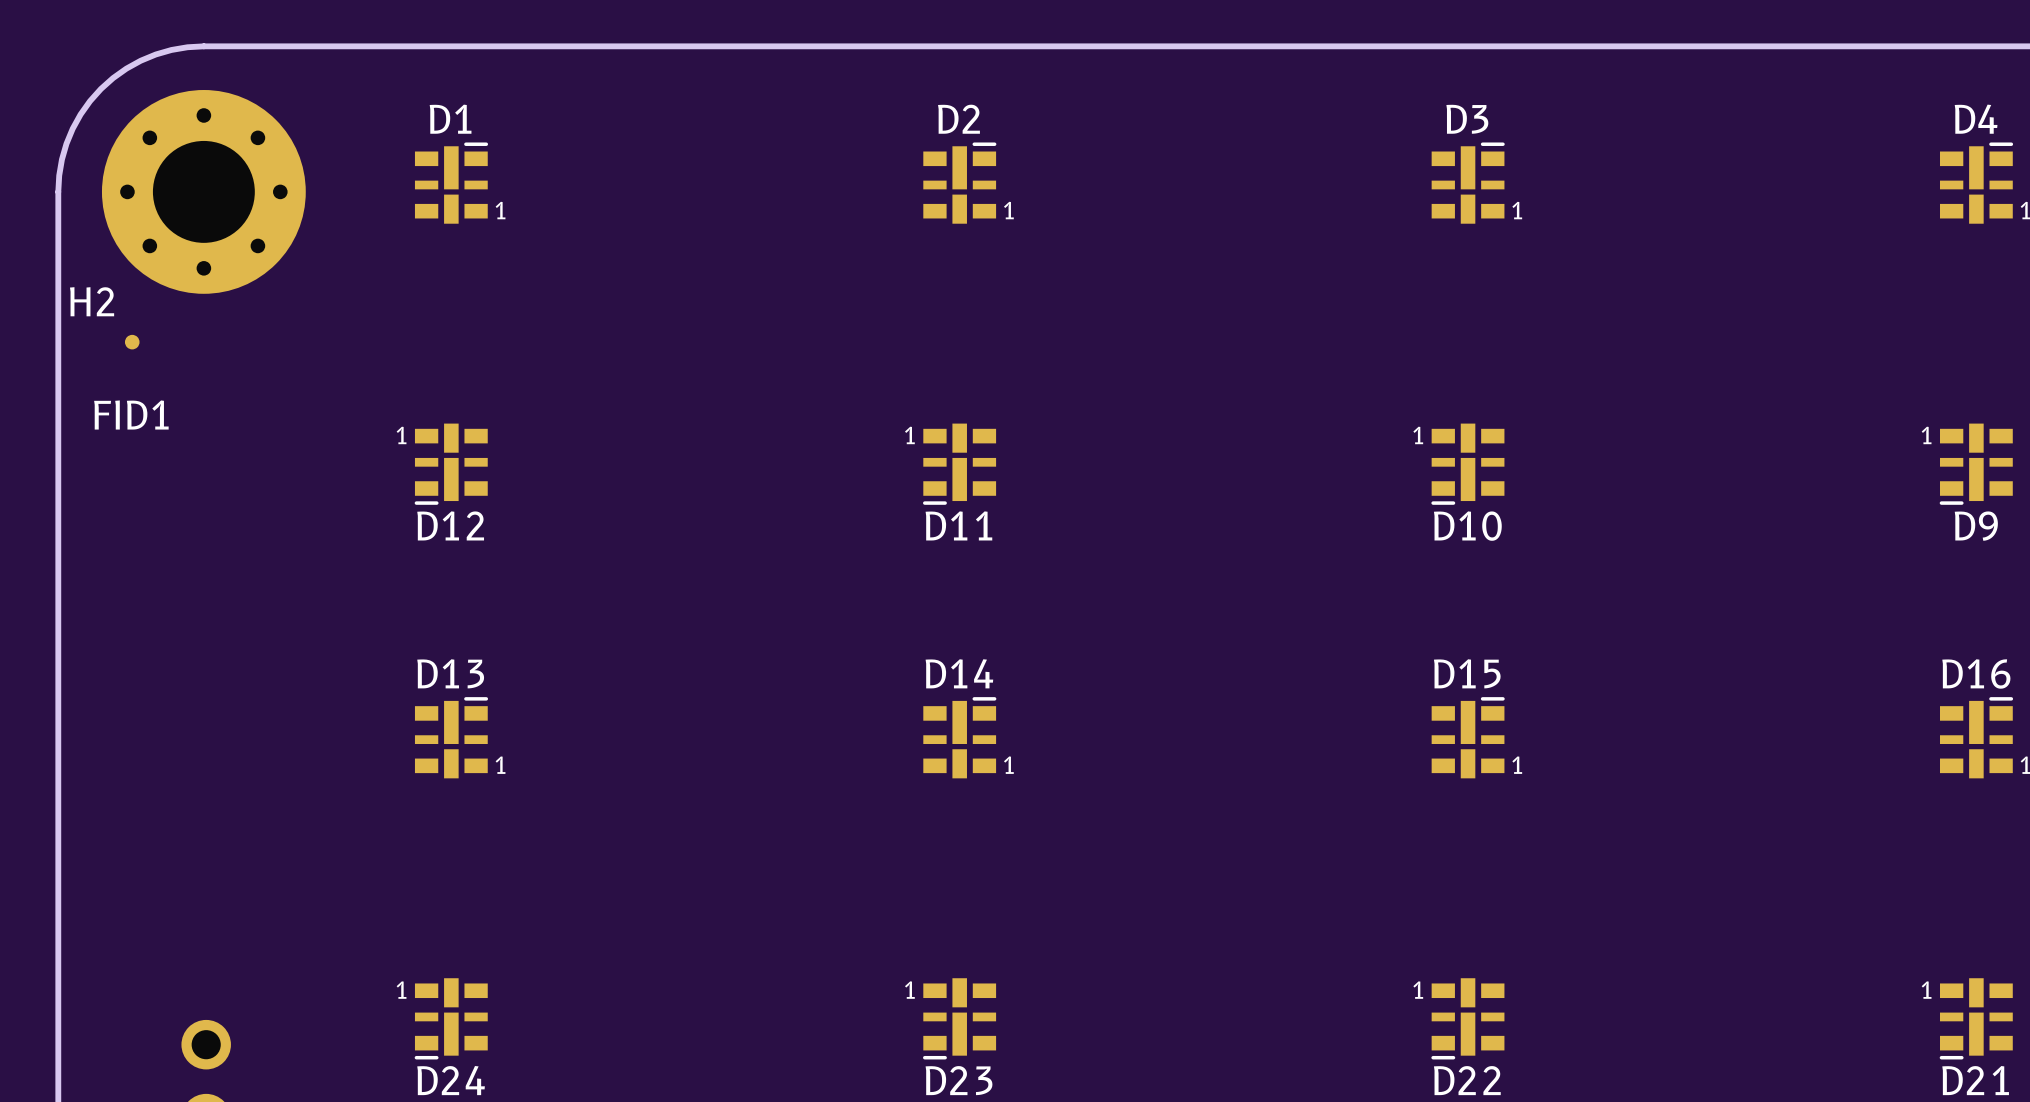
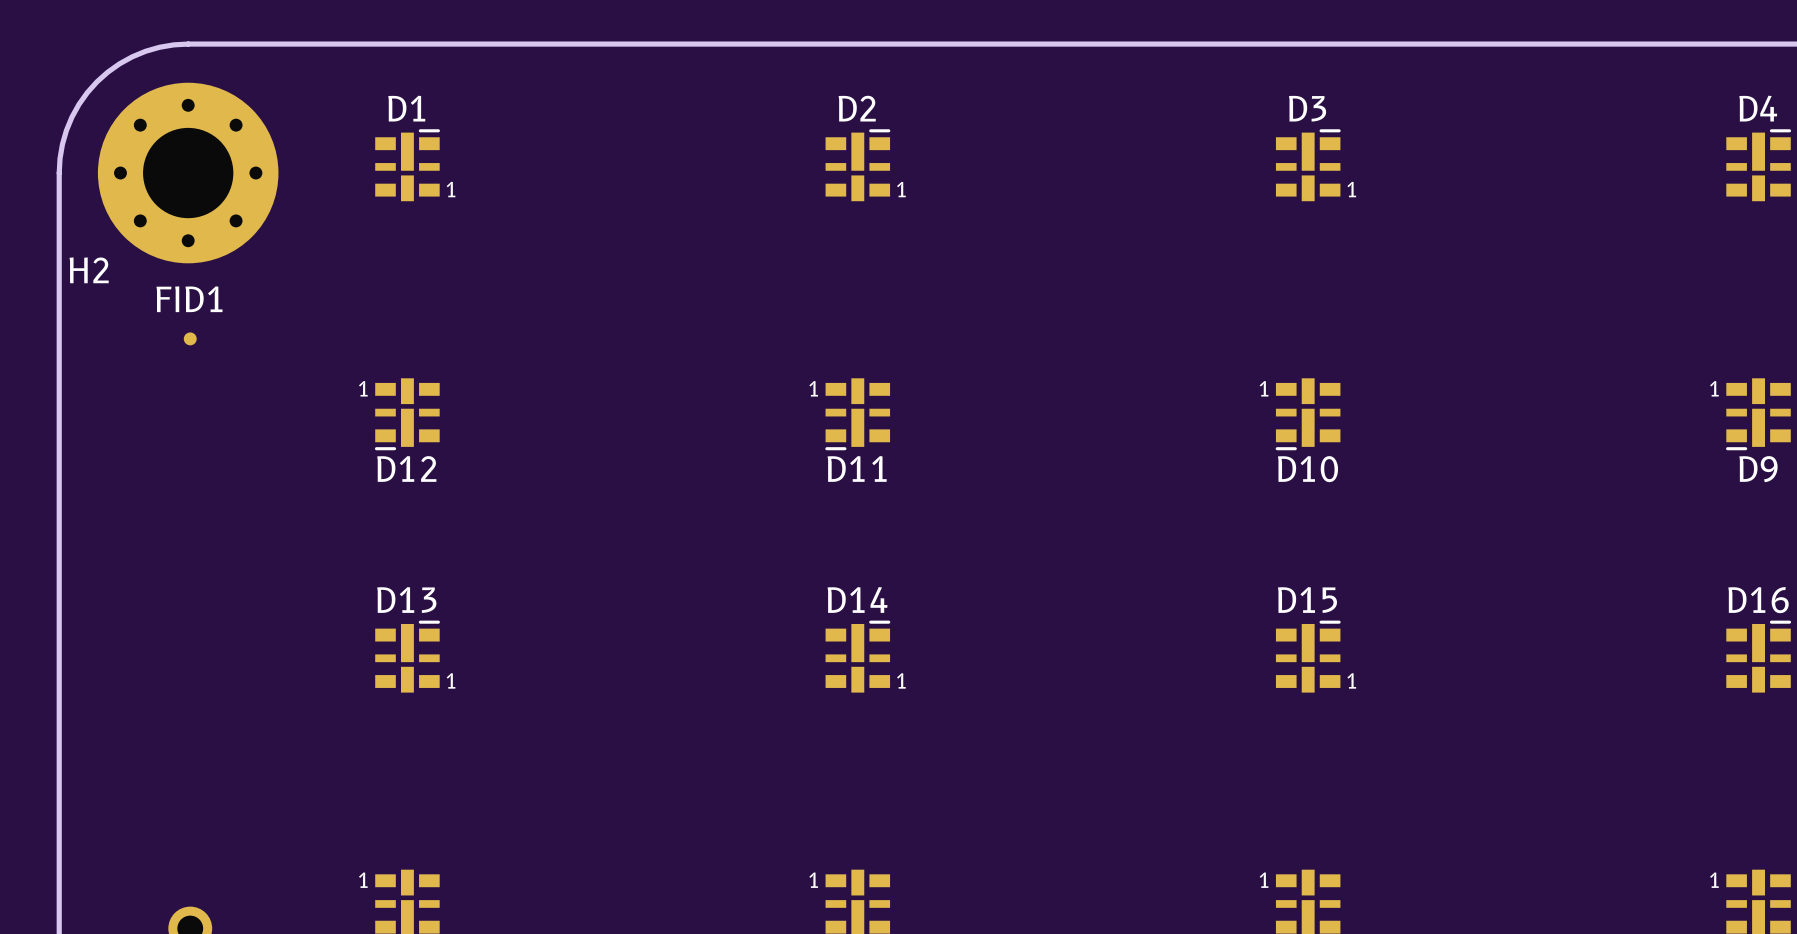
FID1 position: (132, 342) -> (190, 338)
FID1 name position: FID1 (131, 415) -> FID1 (189, 299)

